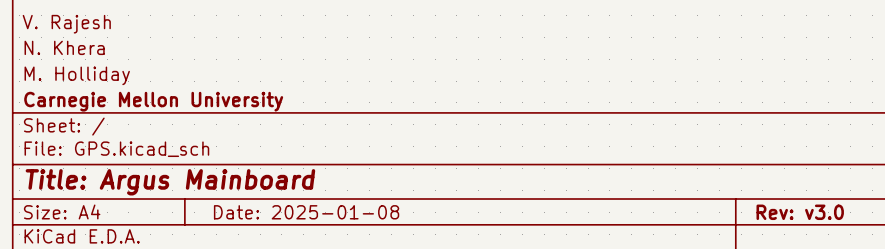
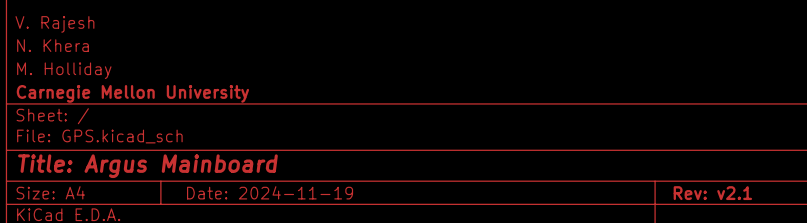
title block: Date: 2025-01-08 (306, 212) -> Date: 2024-11-19 (270, 192)
title block: Rev: v3.0 (800, 212) -> Rev: v2.1 (712, 193)

